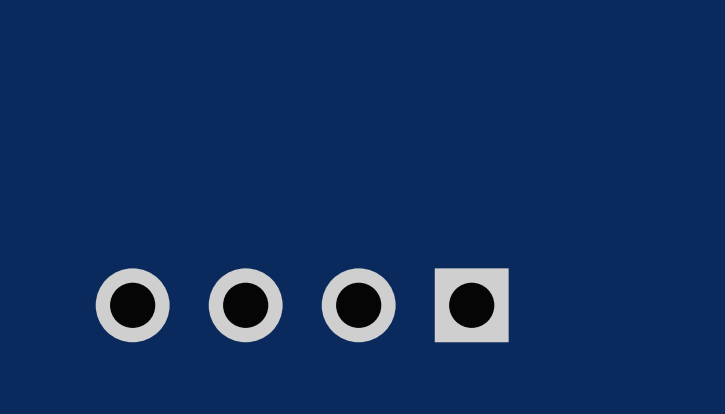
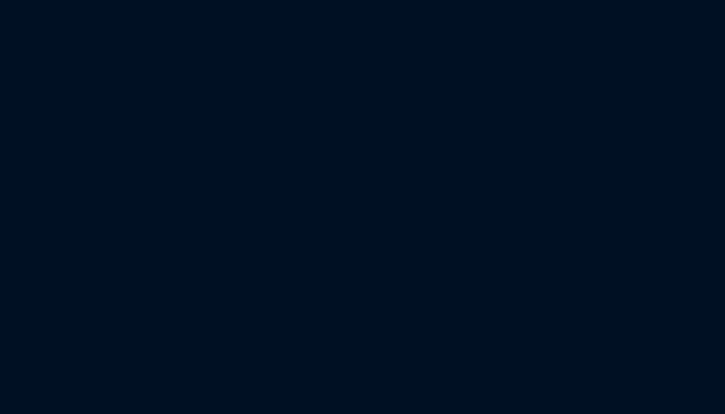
part: (302, 305) -> none

